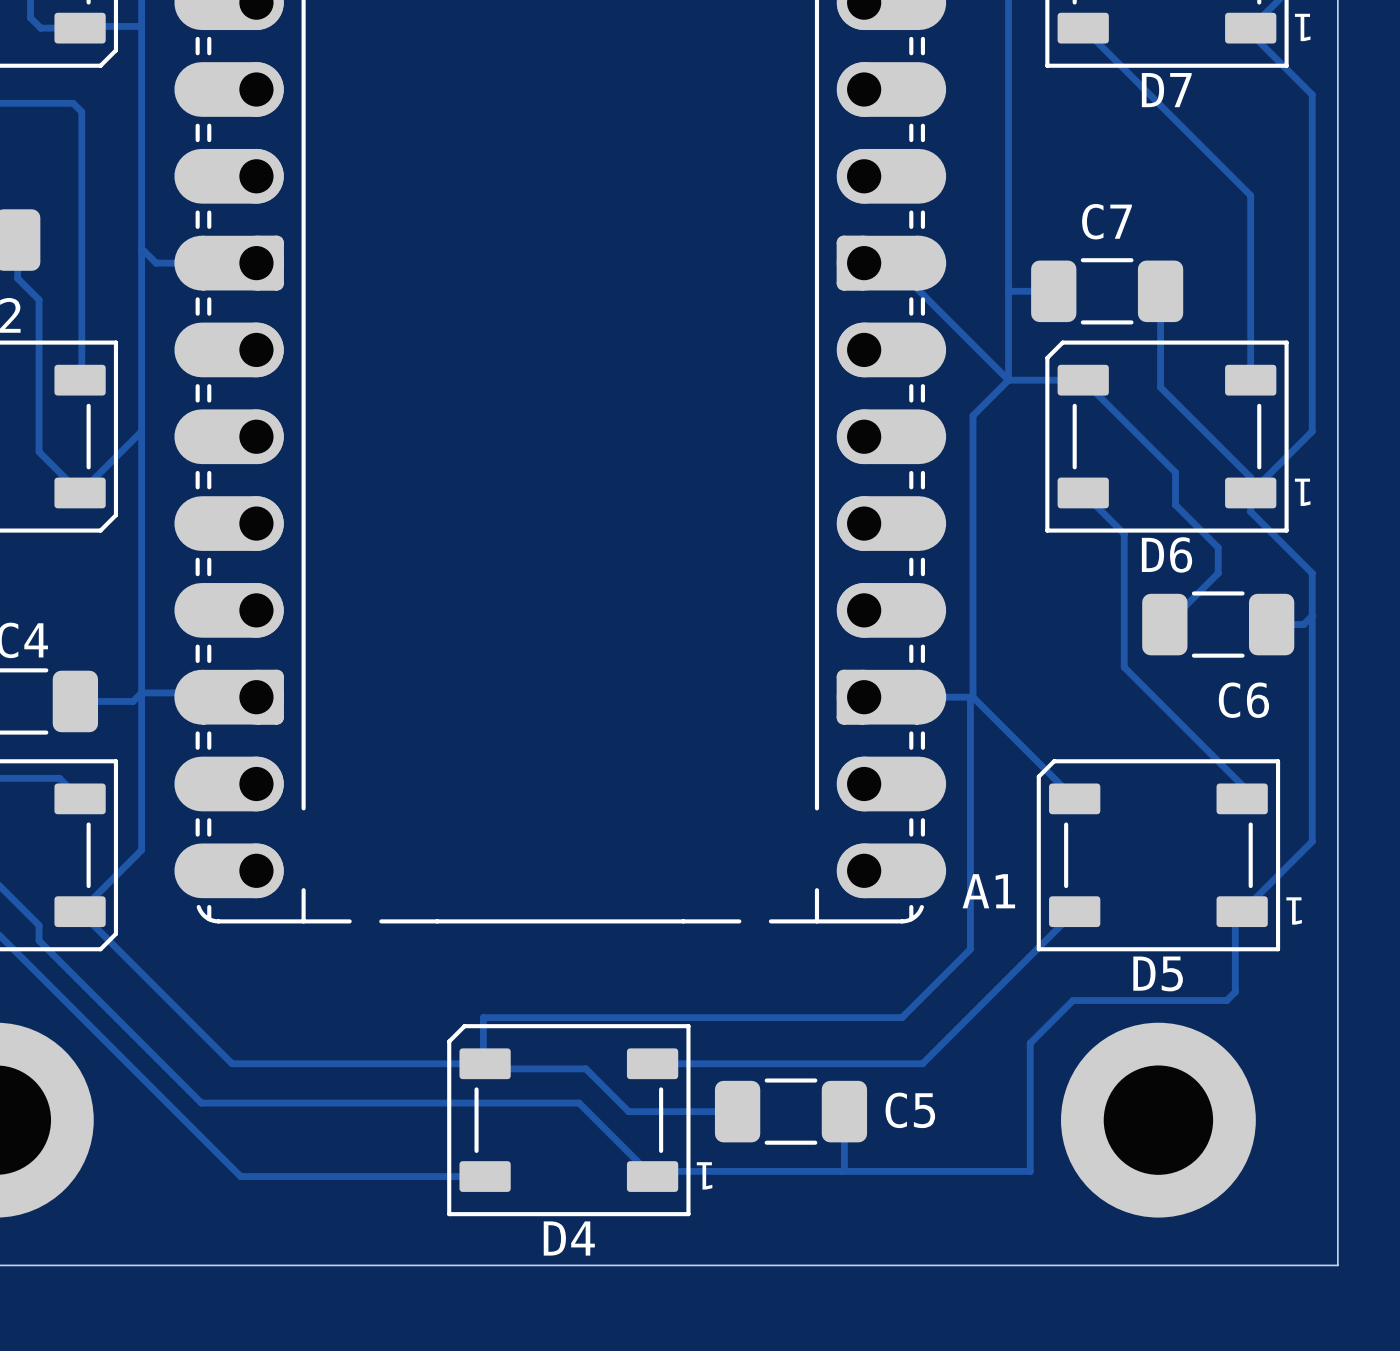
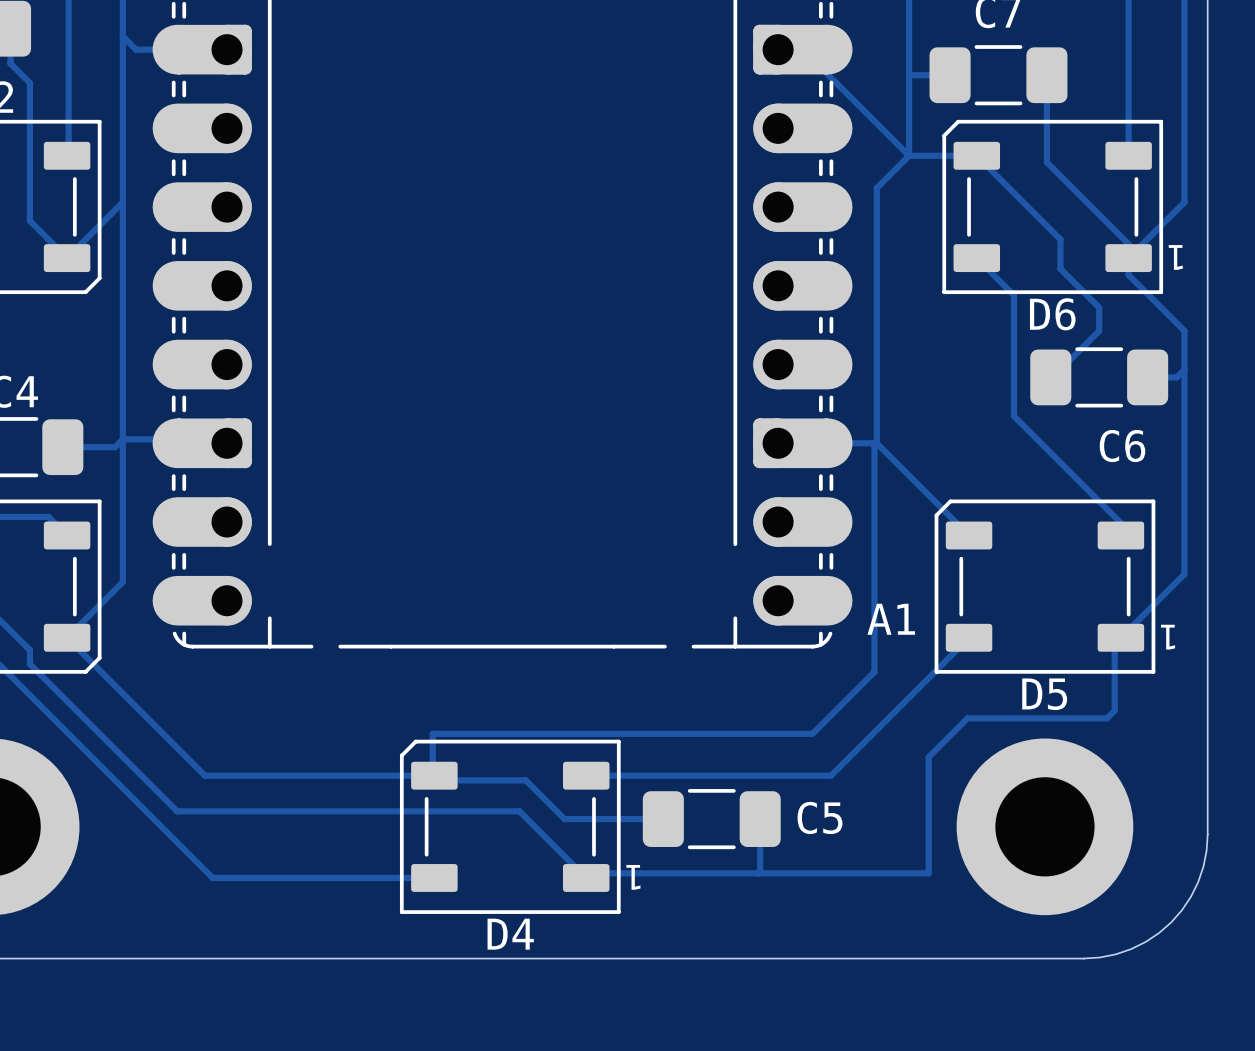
board edge: (1337, 1128) (1337, 1265) (1201, 1265) -> (1207, 834) (1203, 866) (1198, 882) (1182, 910) (1171, 922) (1145, 941) (1131, 949) (1099, 957) (1083, 958)

